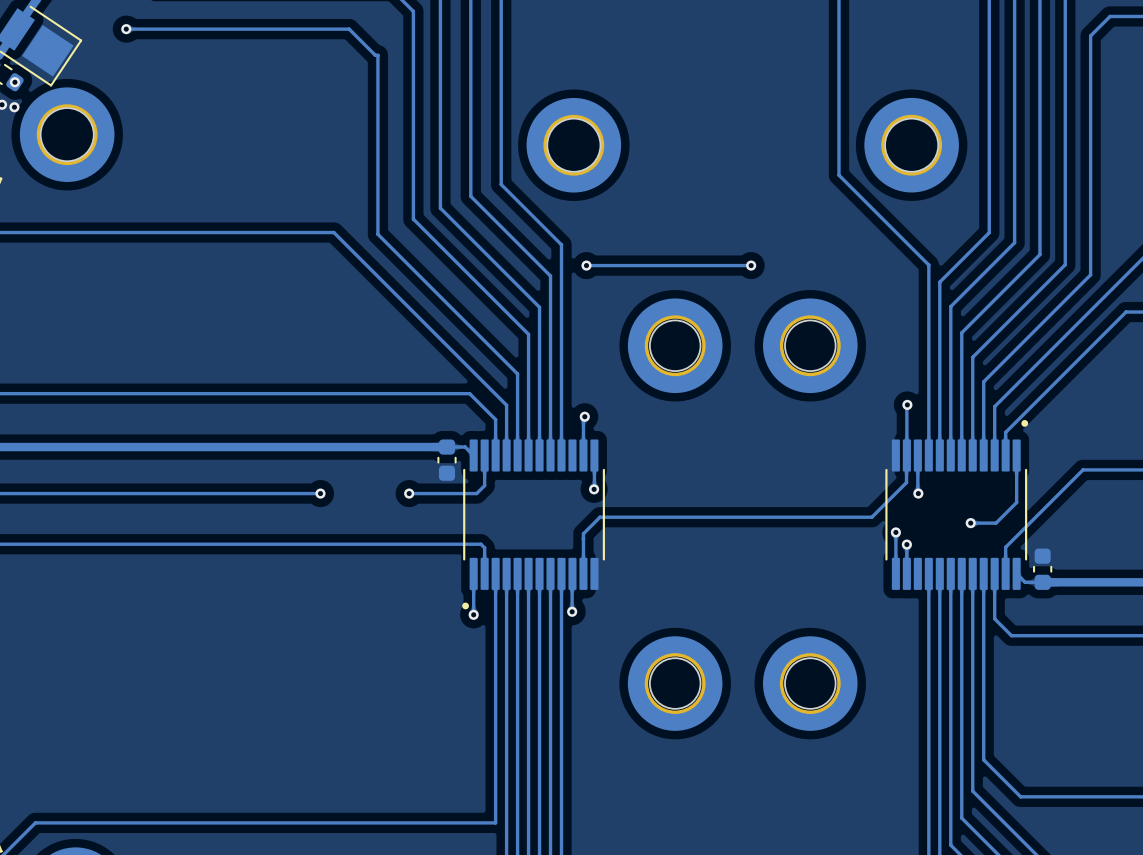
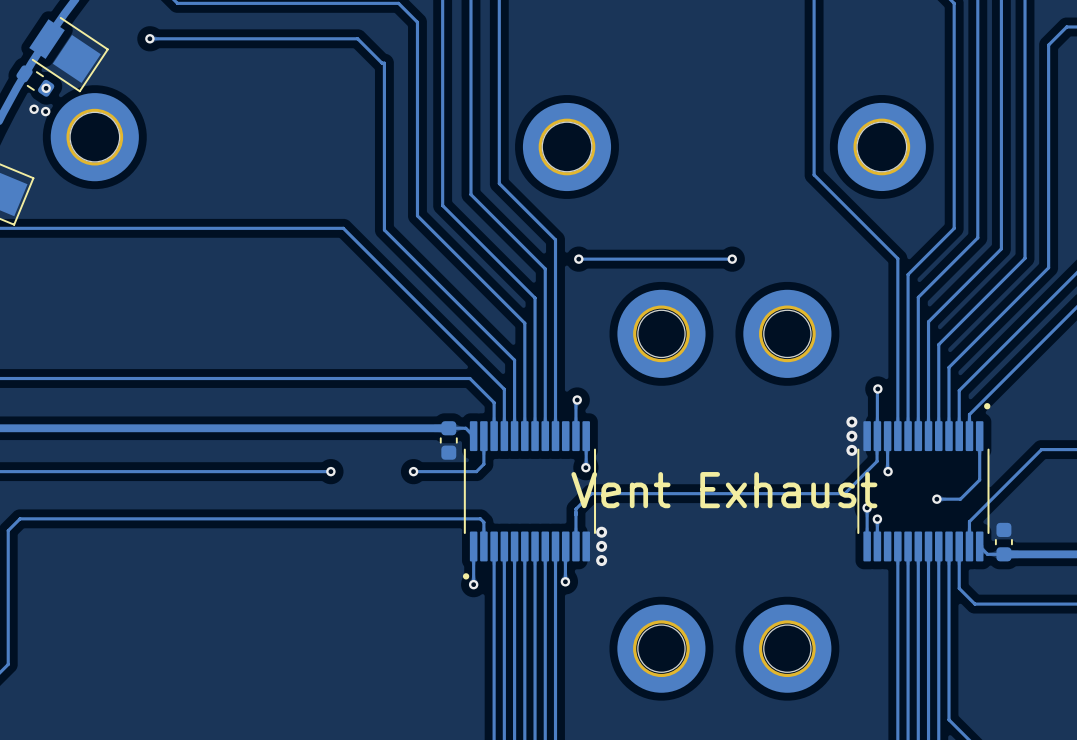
via: none -> (851, 422)
via: none -> (851, 436)
via: none -> (851, 450)
text: none -> Vent Exhaust (724, 490)
via: none -> (601, 532)
via: none -> (601, 546)
via: none -> (601, 560)

